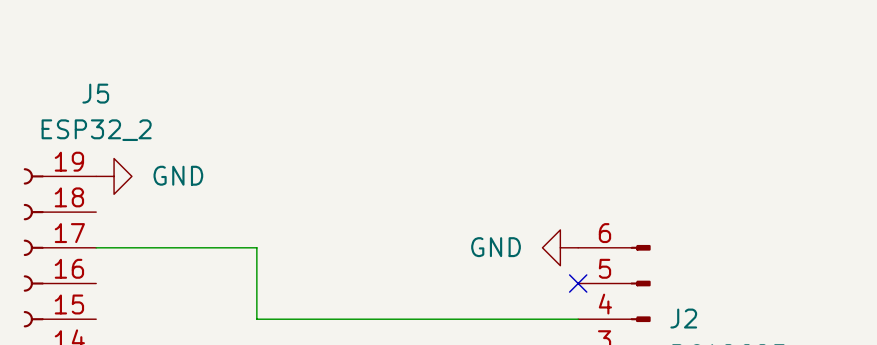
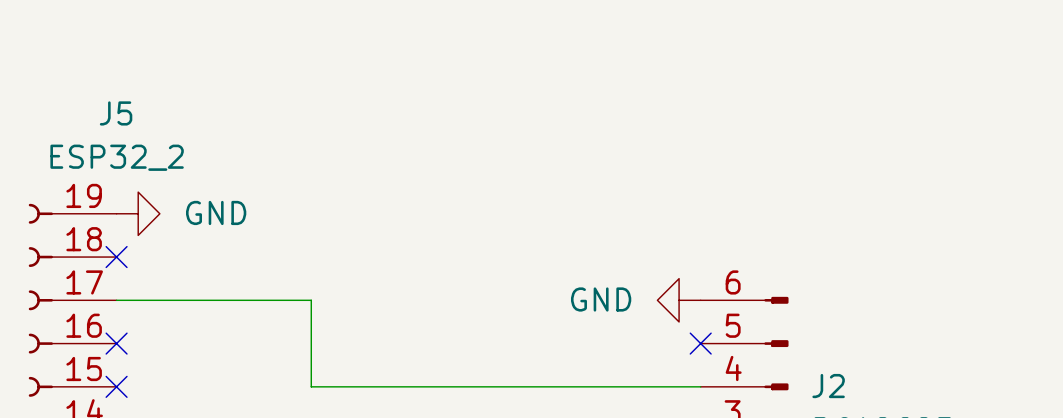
no-connect mark: none -> (116, 257)
no-connect mark: none -> (116, 343)
no-connect mark: none -> (116, 386)

